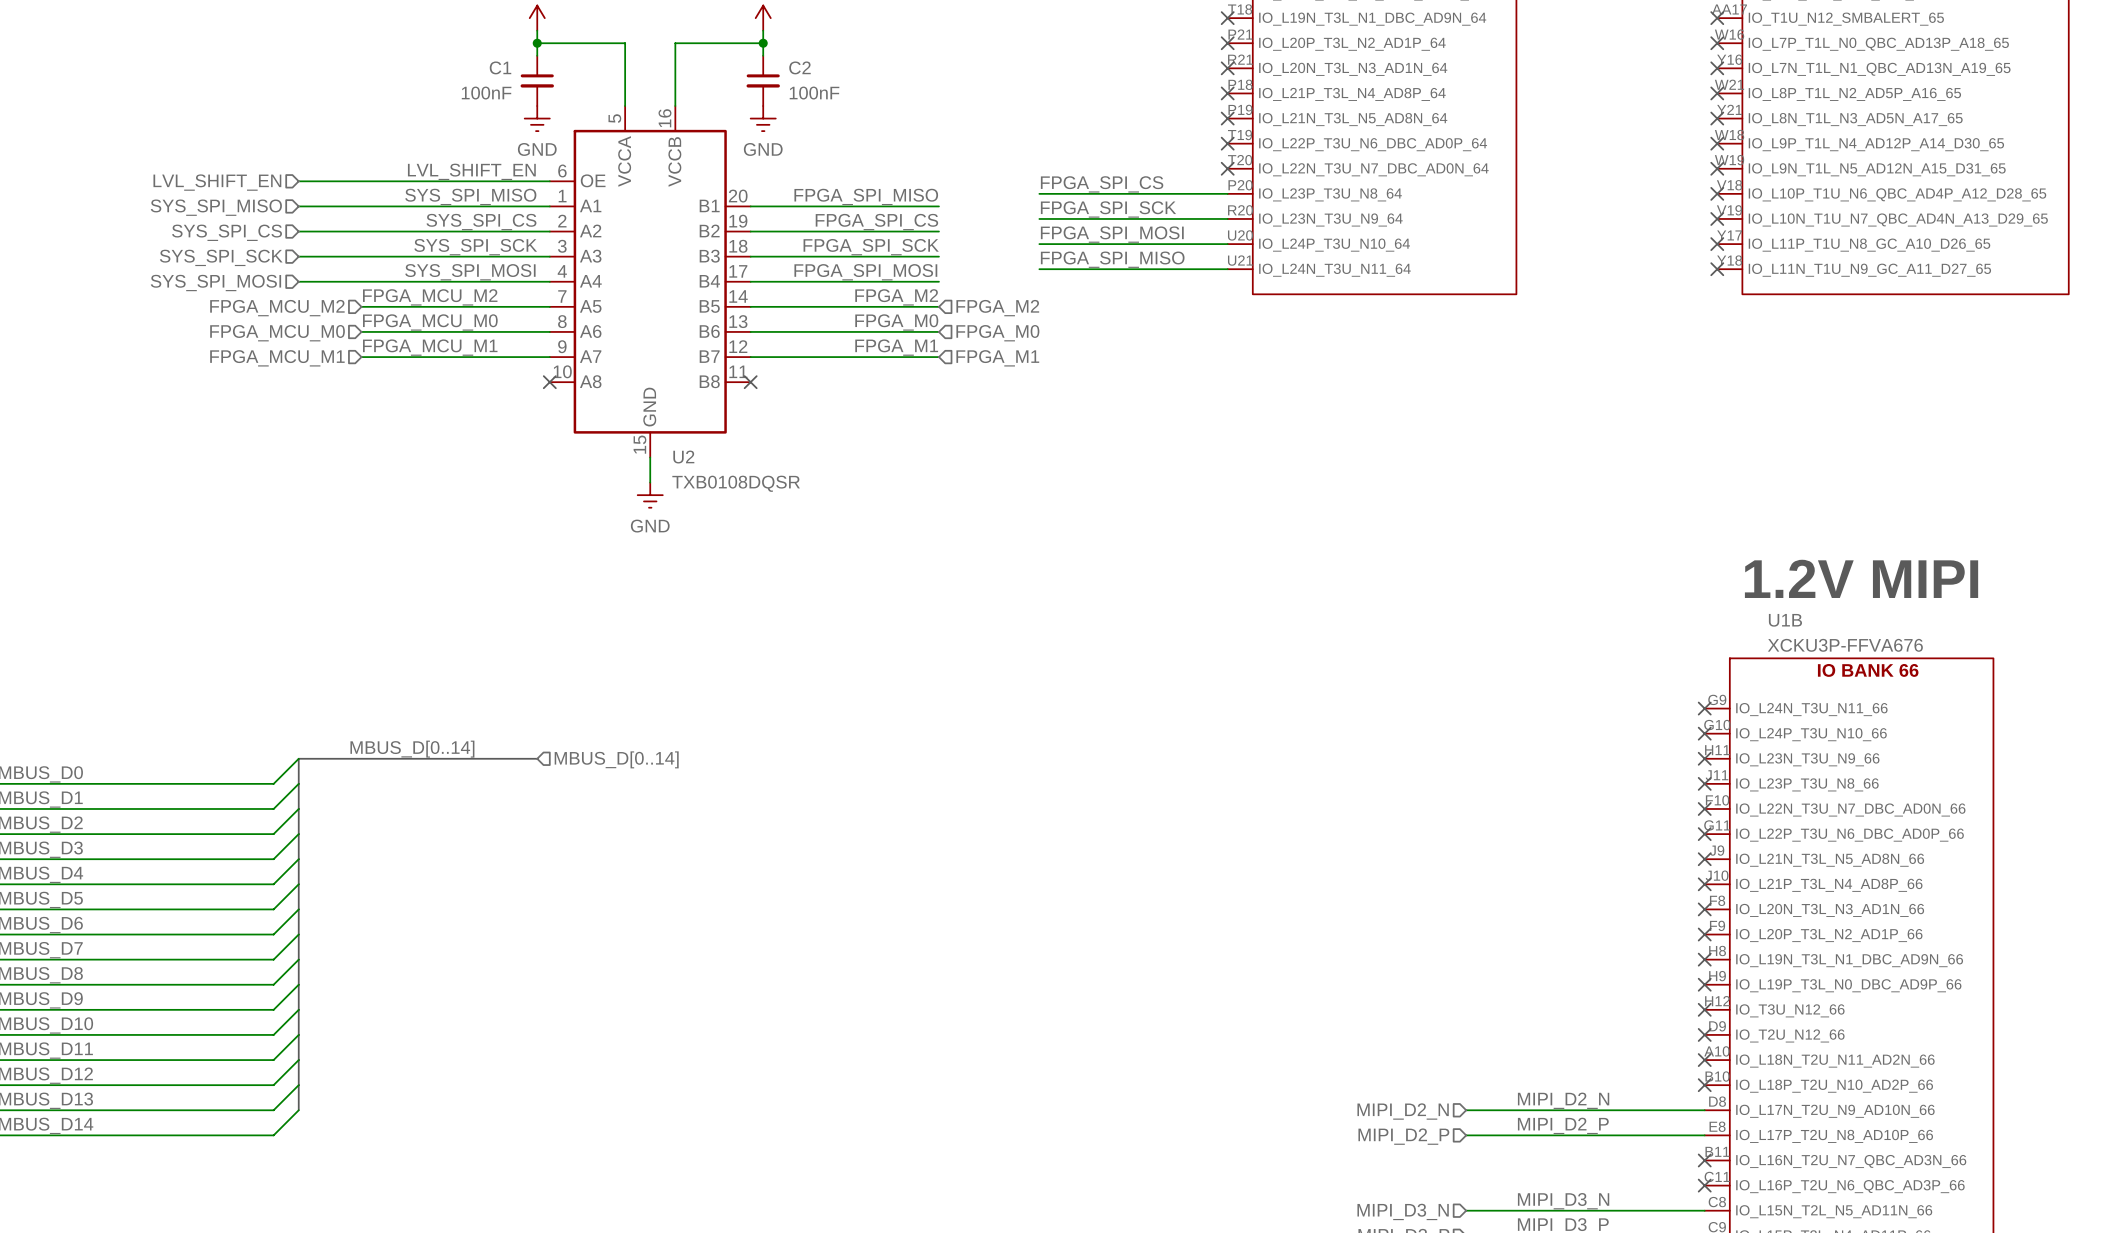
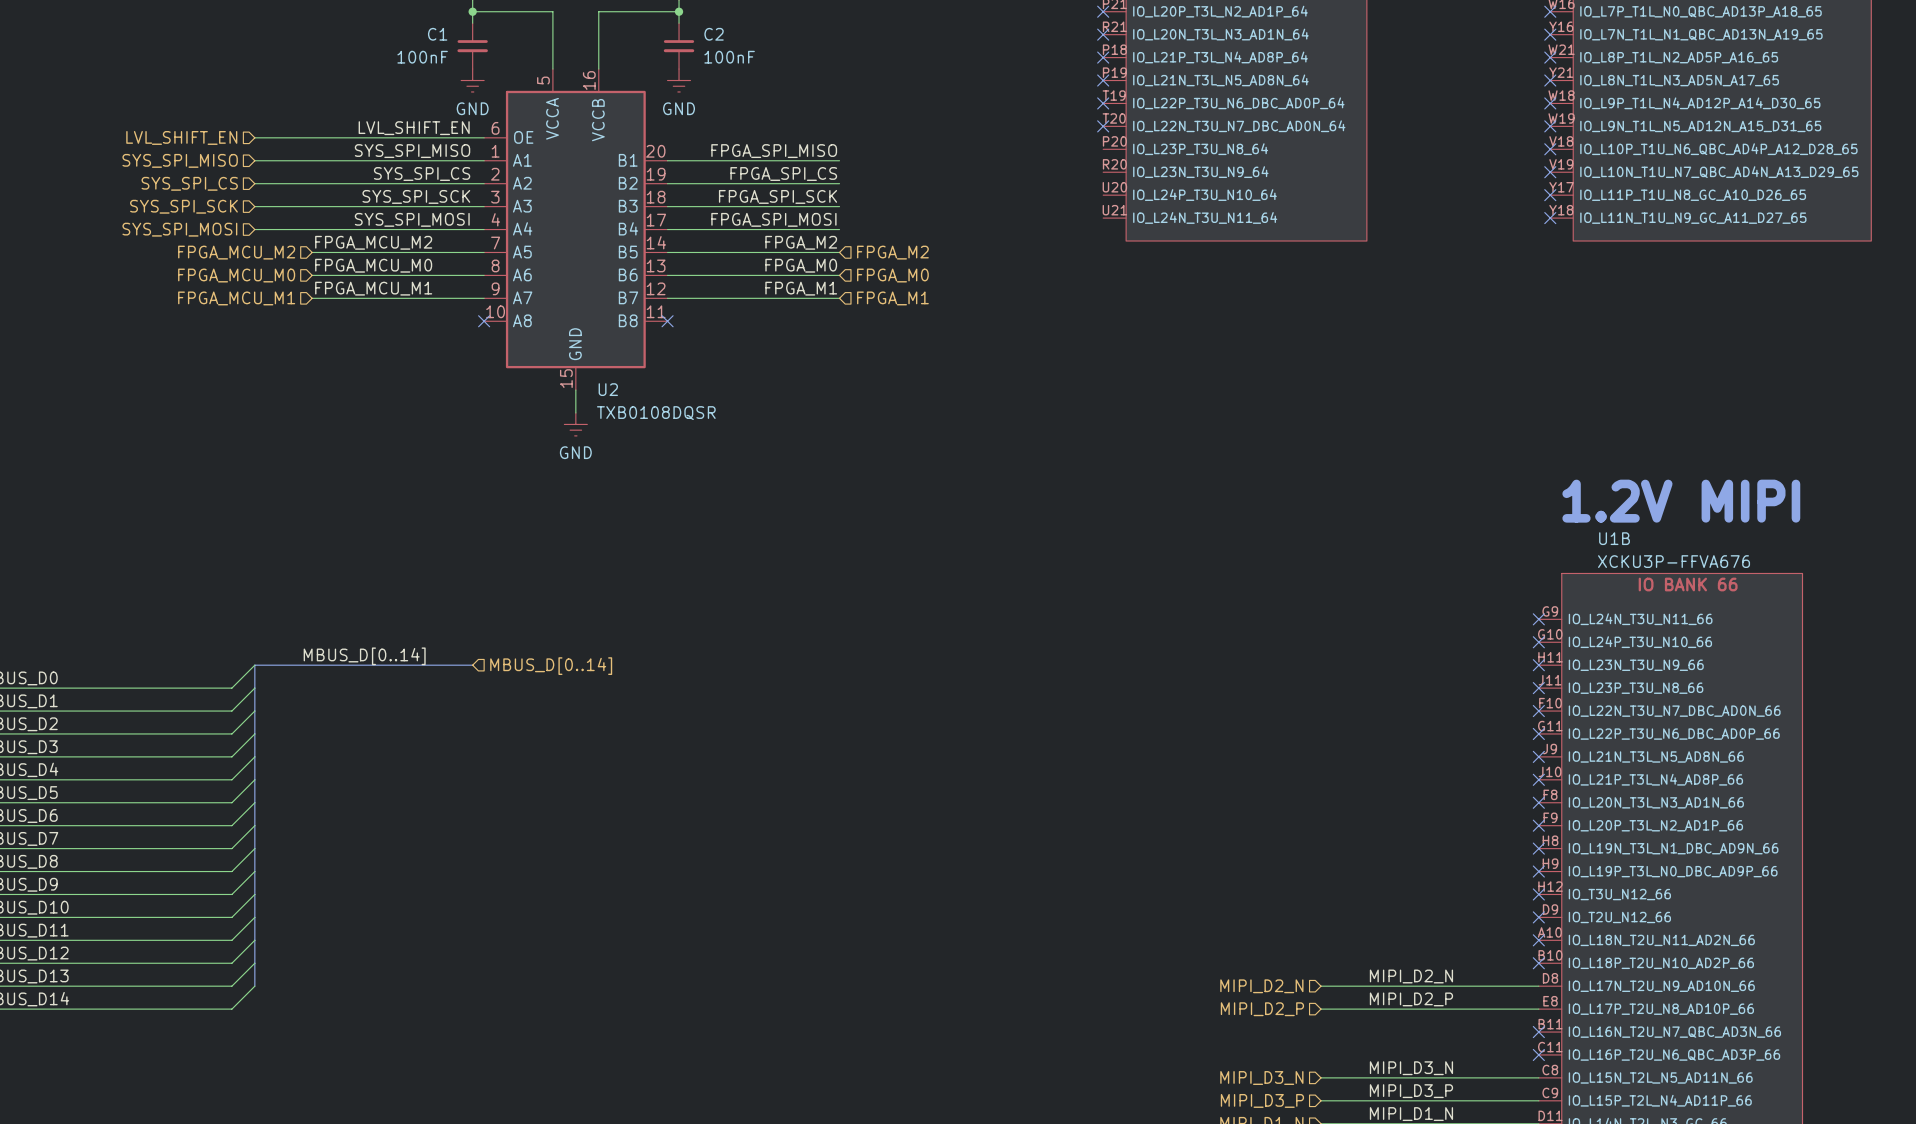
label: FPGA_SPI_CS (1102, 184) -> none
wire: (1039, 193) (1227, 193) -> none
label: FPGA_SPI_SCK (1108, 209) -> none
wire: (1039, 218) (1227, 218) -> none
label: FPGA_SPI_MOSI (1112, 234) -> none
wire: (1039, 244) (1227, 244) -> none
label: FPGA_SPI_MISO (1112, 259) -> none
wire: (1039, 269) (1227, 269) -> none

